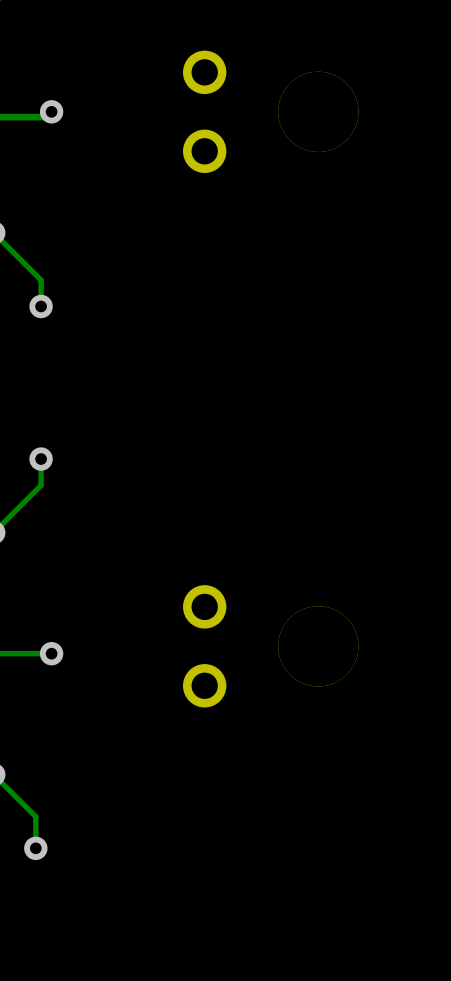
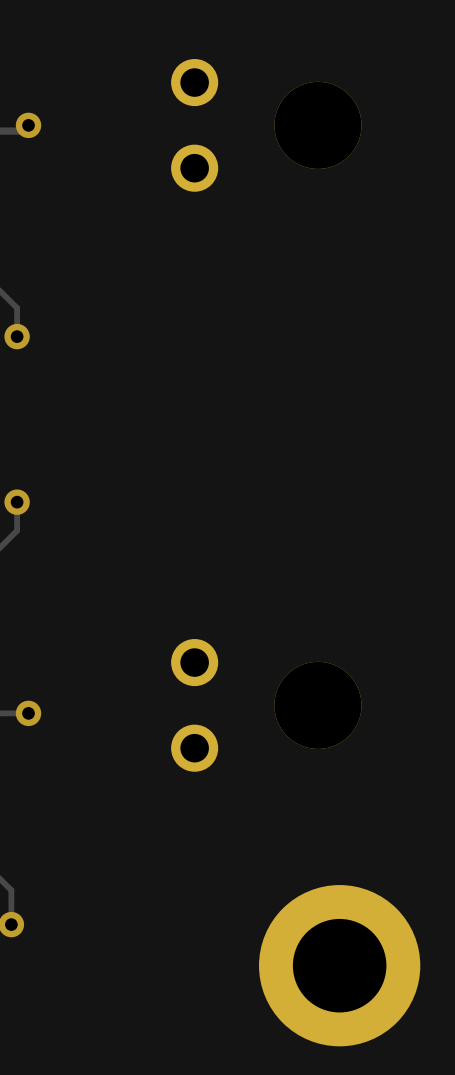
part: none -> (339, 965)

